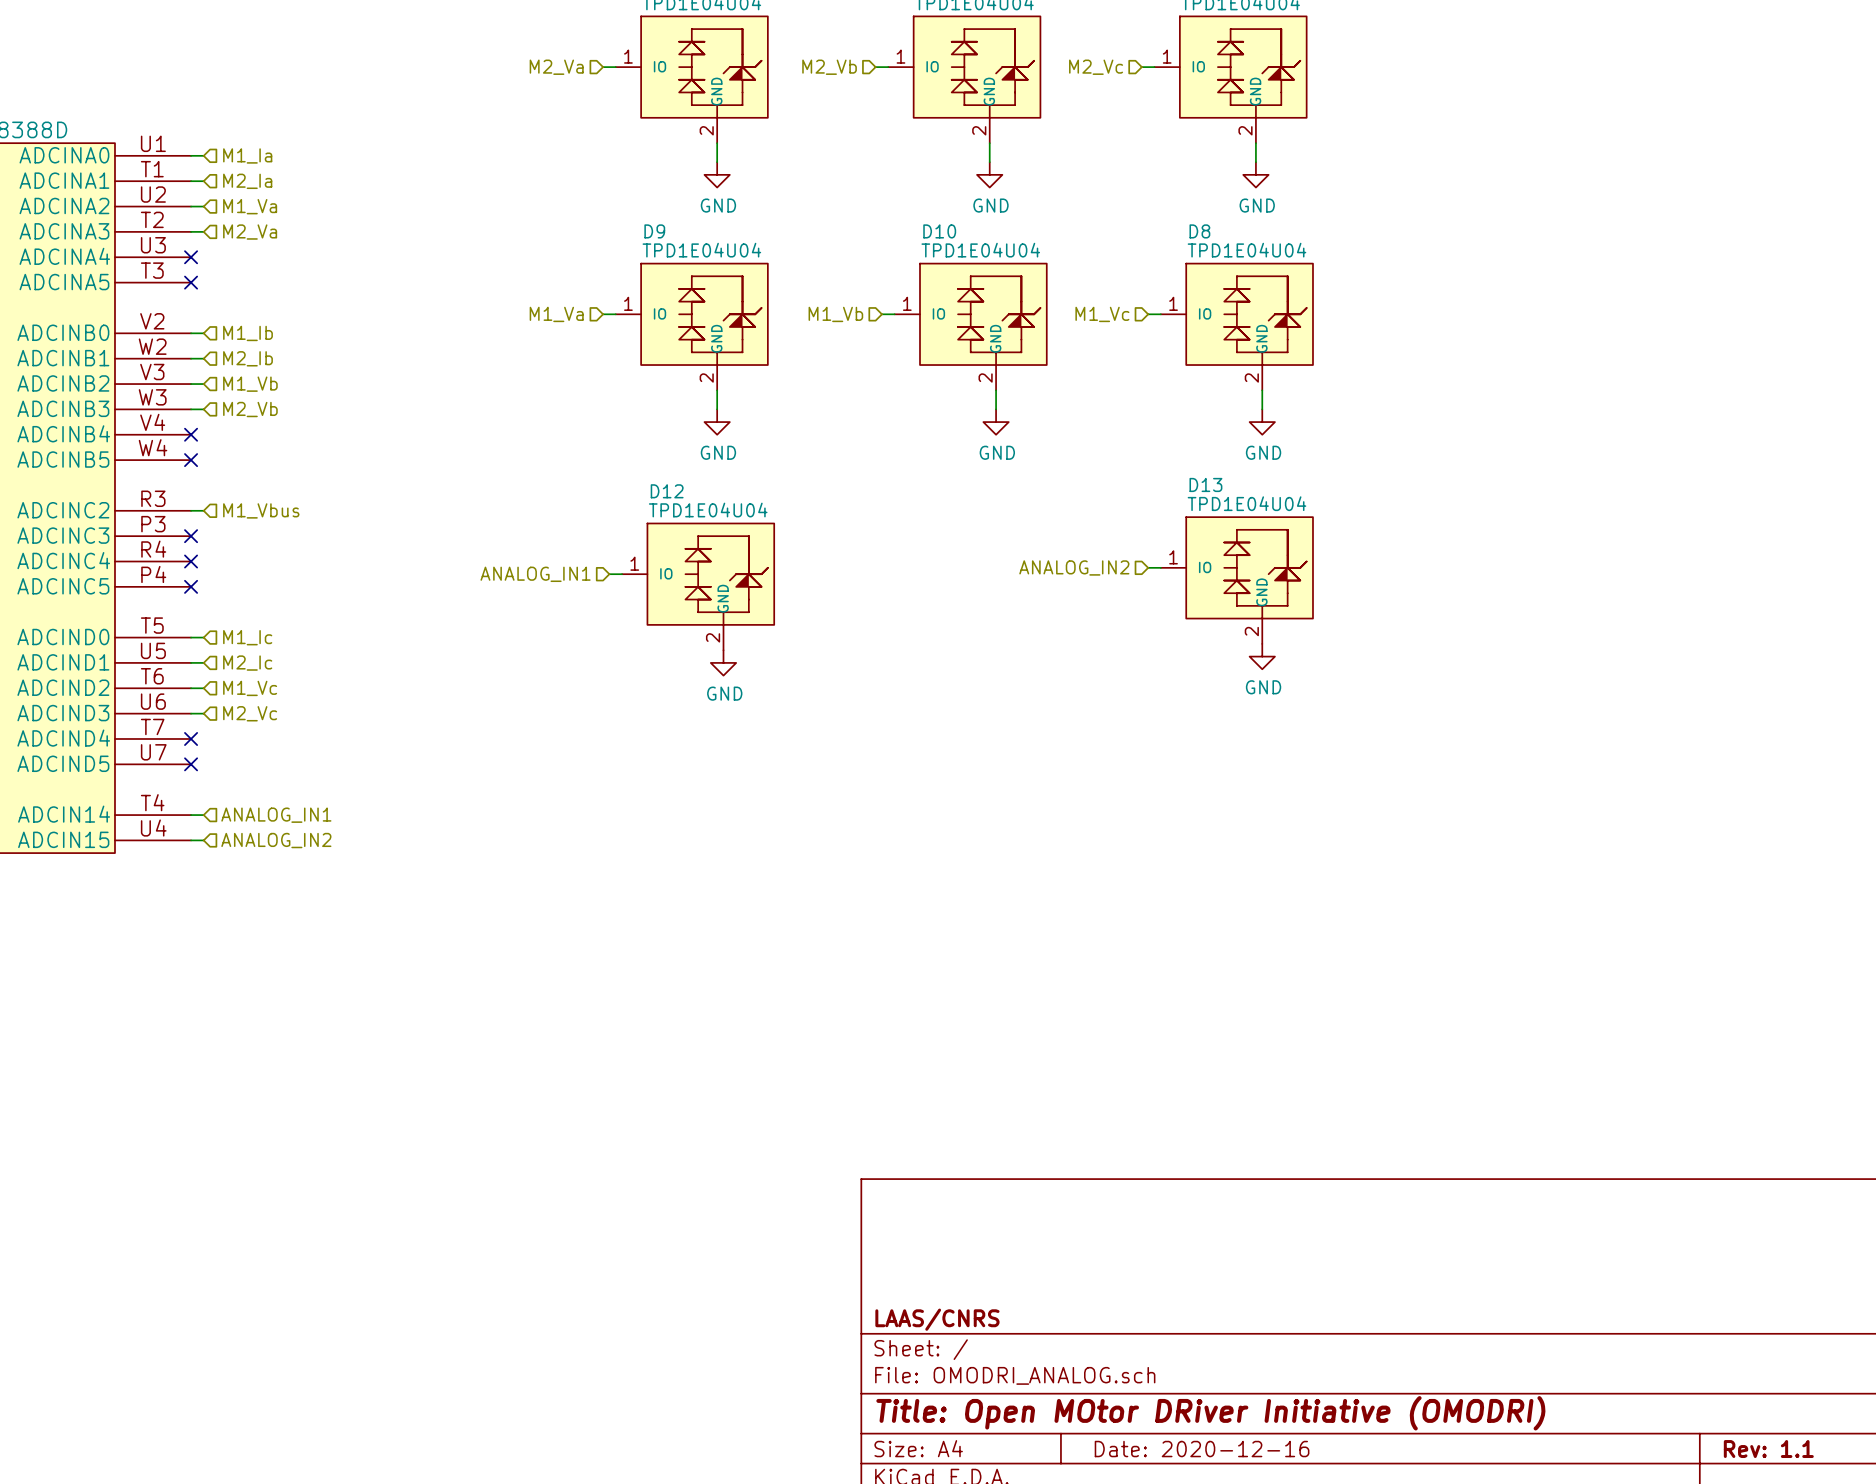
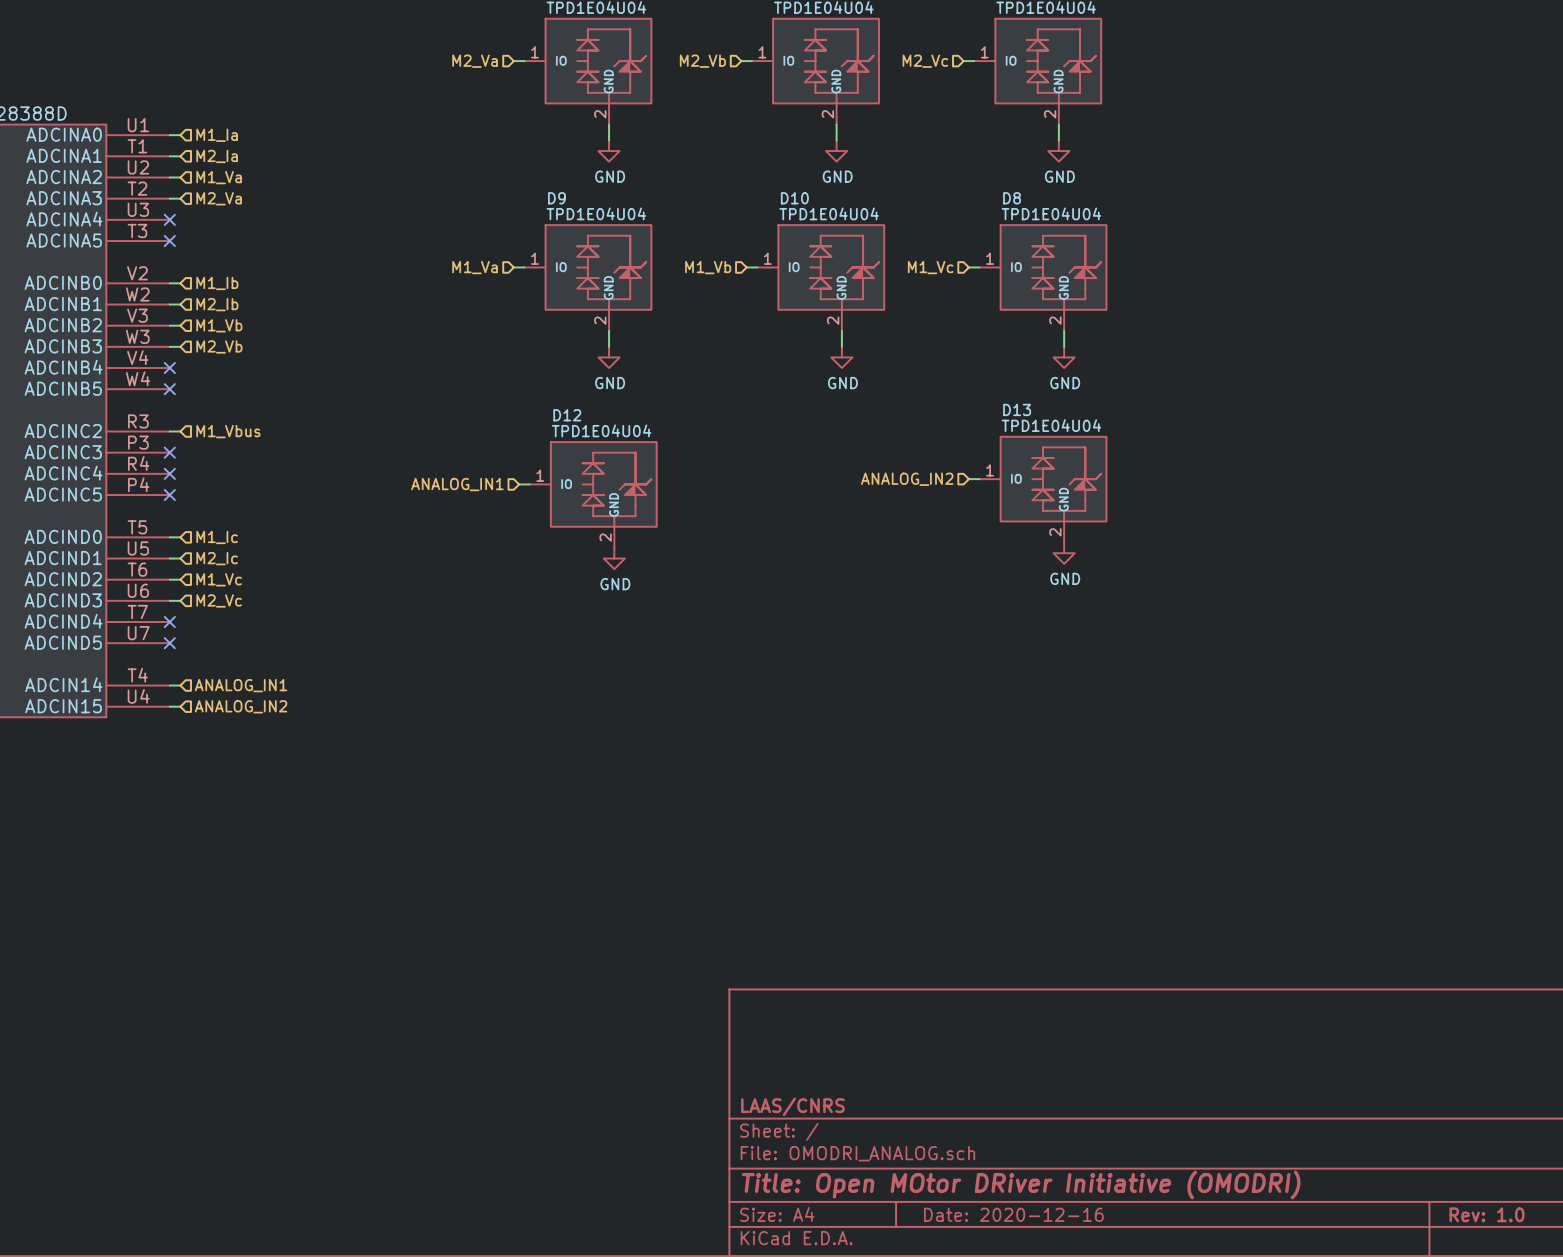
title block: Rev: 1.1 (1768, 1449) -> Rev: 1.0 (1487, 1214)

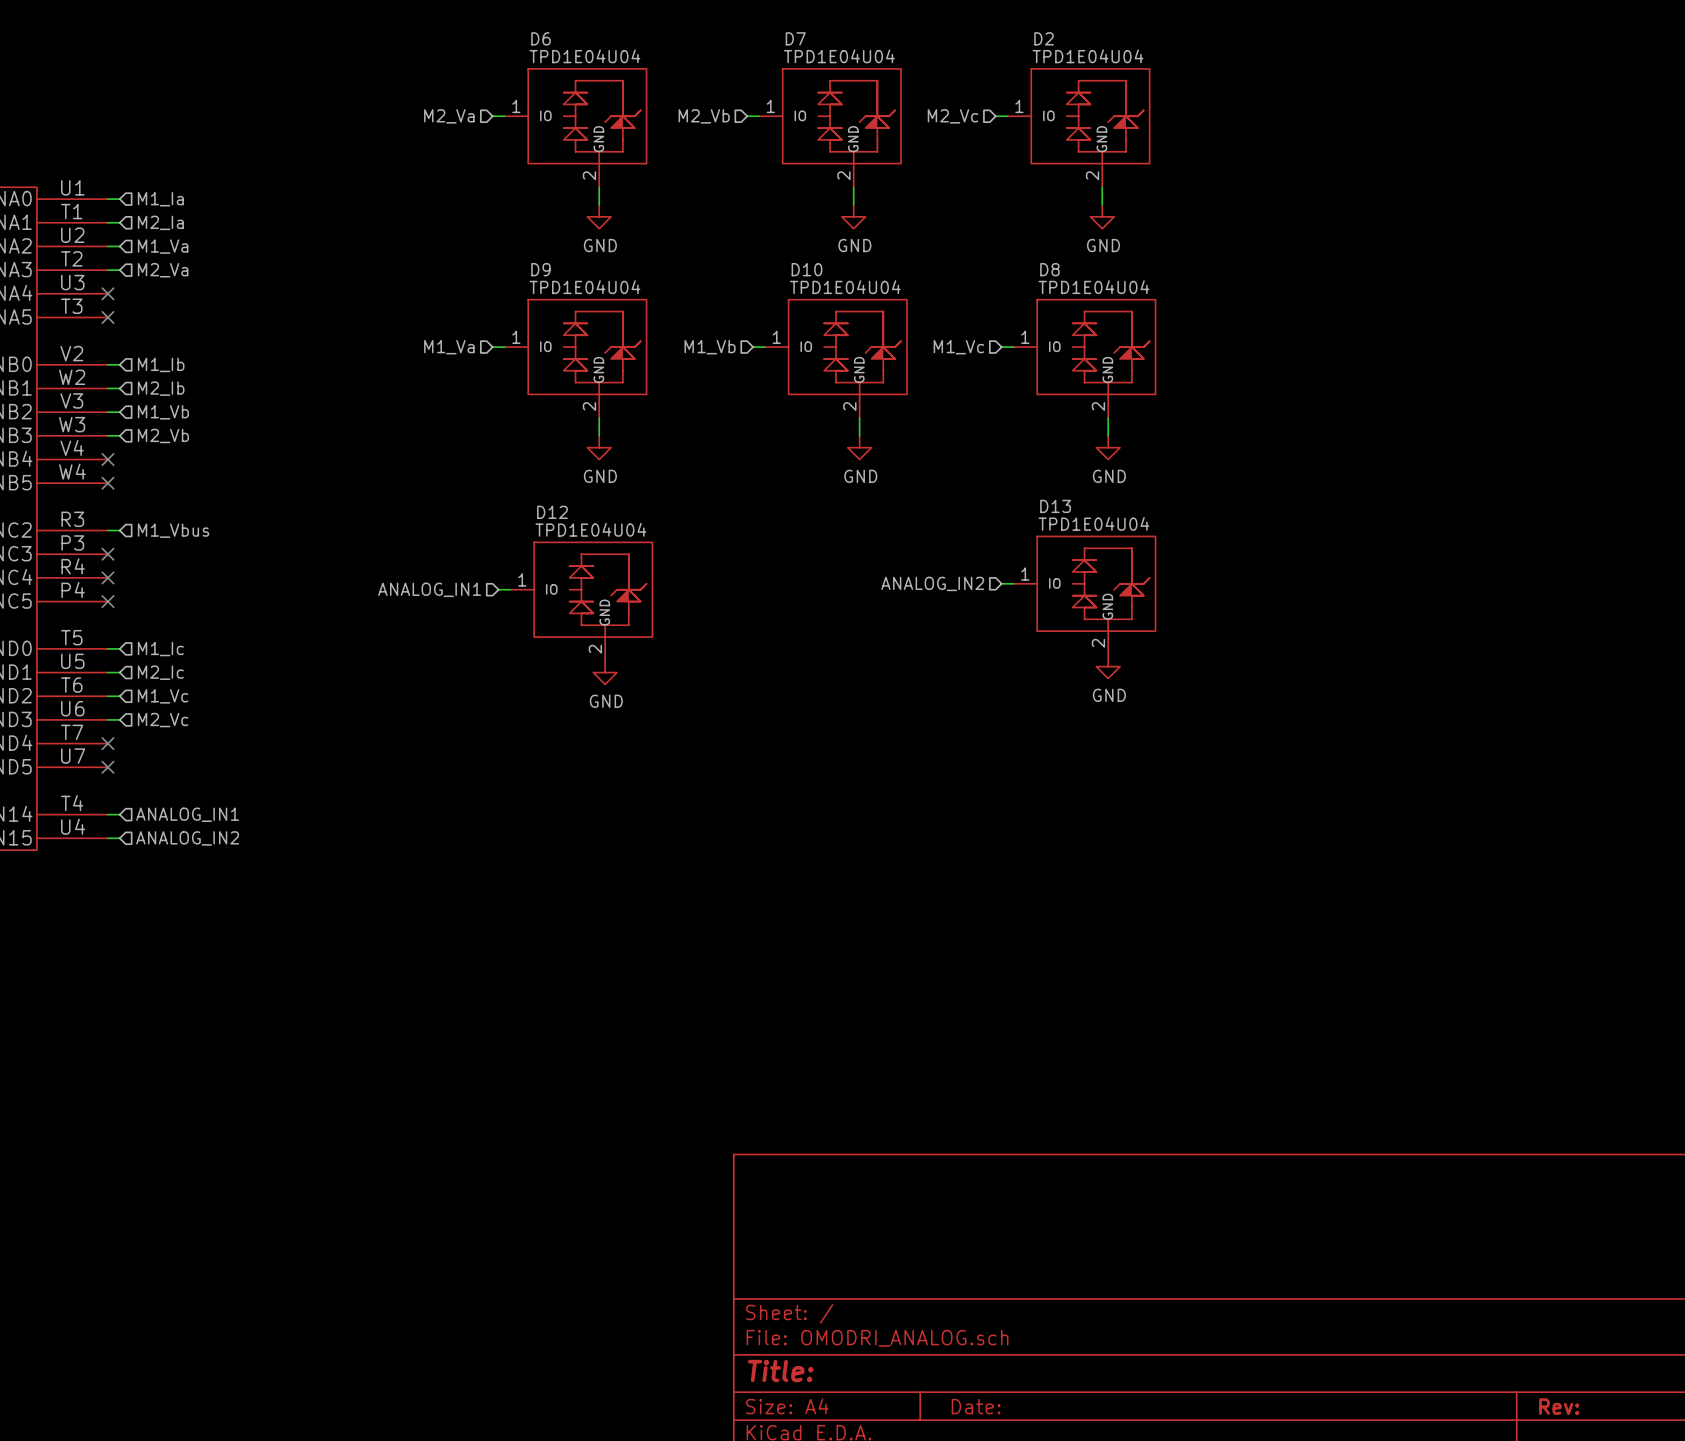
title block: LAAS/CNRS (792, 1106) -> none
title block: Title: Open MOtor DRiver Initiative (OMODRI) (1021, 1184) -> Title: (780, 1370)
title block: Date: 2020-12-16 (1013, 1214) -> Date: (976, 1406)
title block: Rev: 1.0 (1487, 1214) -> Rev: (1559, 1406)

